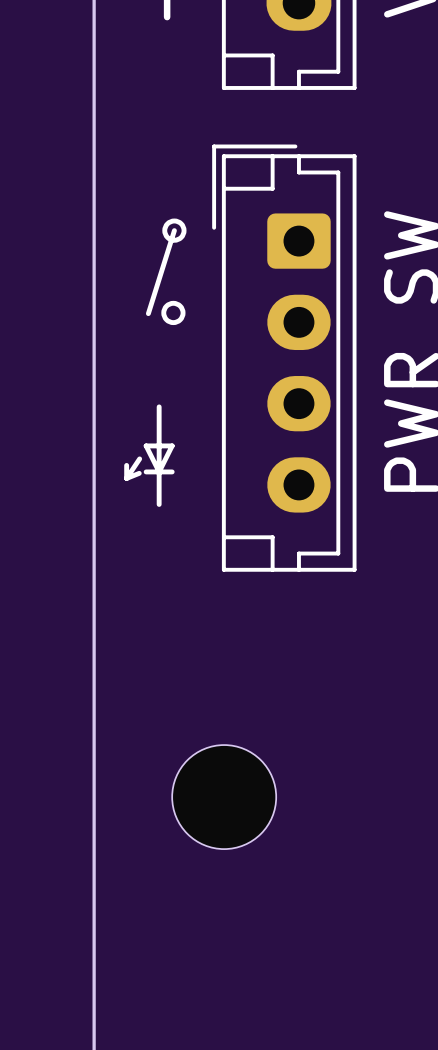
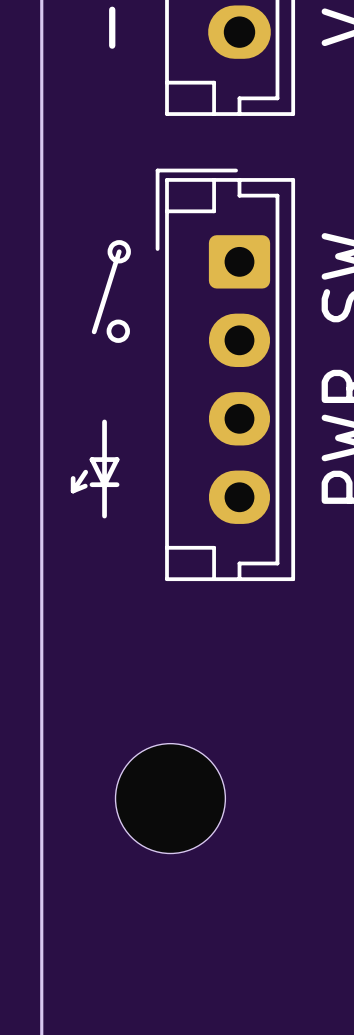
part footprint: [172, 745, 277, 850] -> [115, 743, 226, 854]

